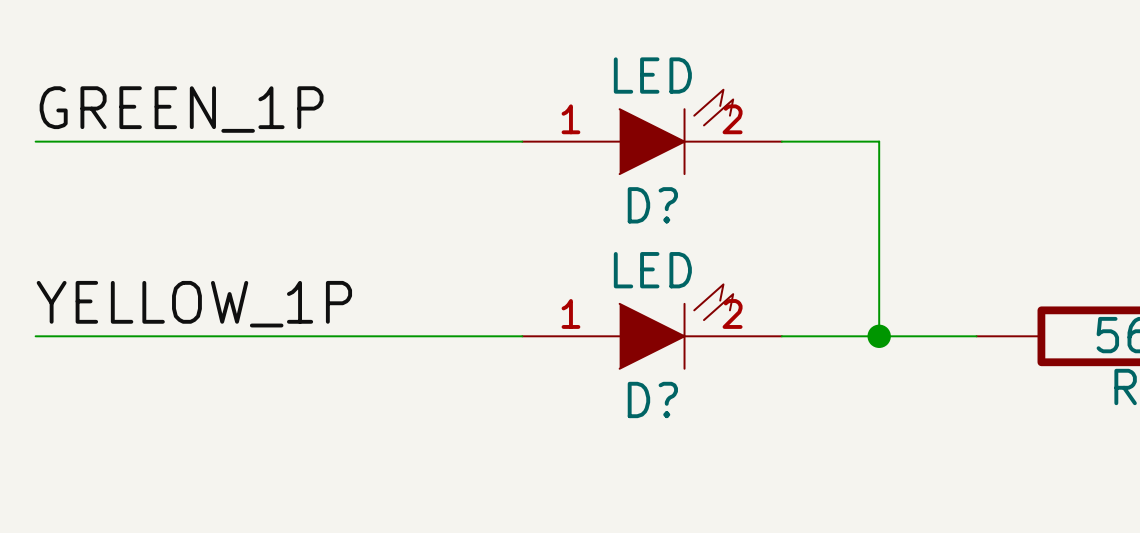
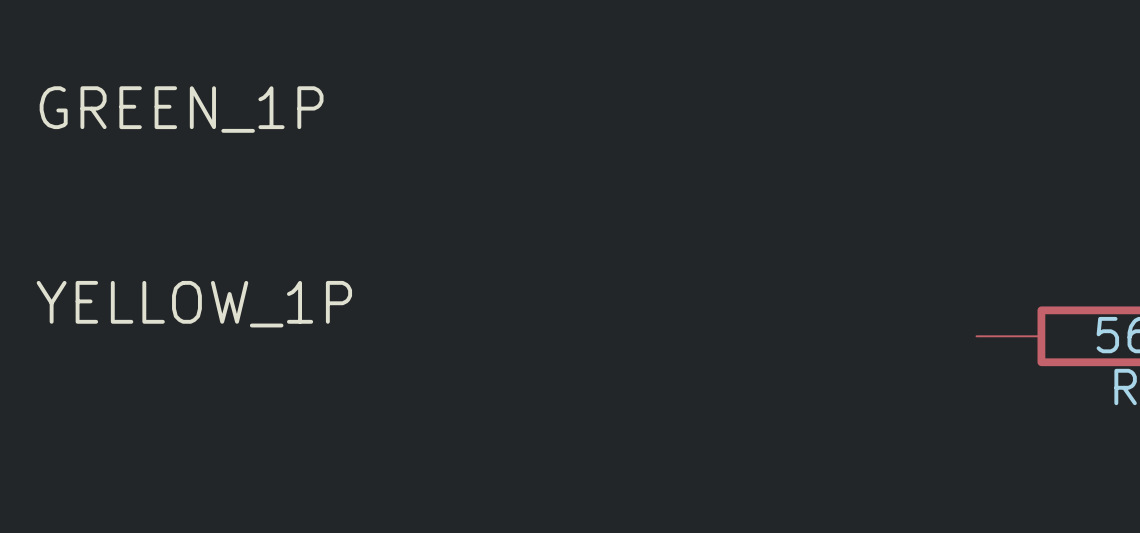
D?: LED (652, 131) -> none
wire: (35, 141) (522, 141) -> none
wire: (781, 141) (879, 141) (879, 336) -> none
D?: LED (652, 326) -> none
wire: (35, 336) (522, 336) -> none
wire: (781, 336) (976, 336) -> none
junction: (879, 336) -> none

